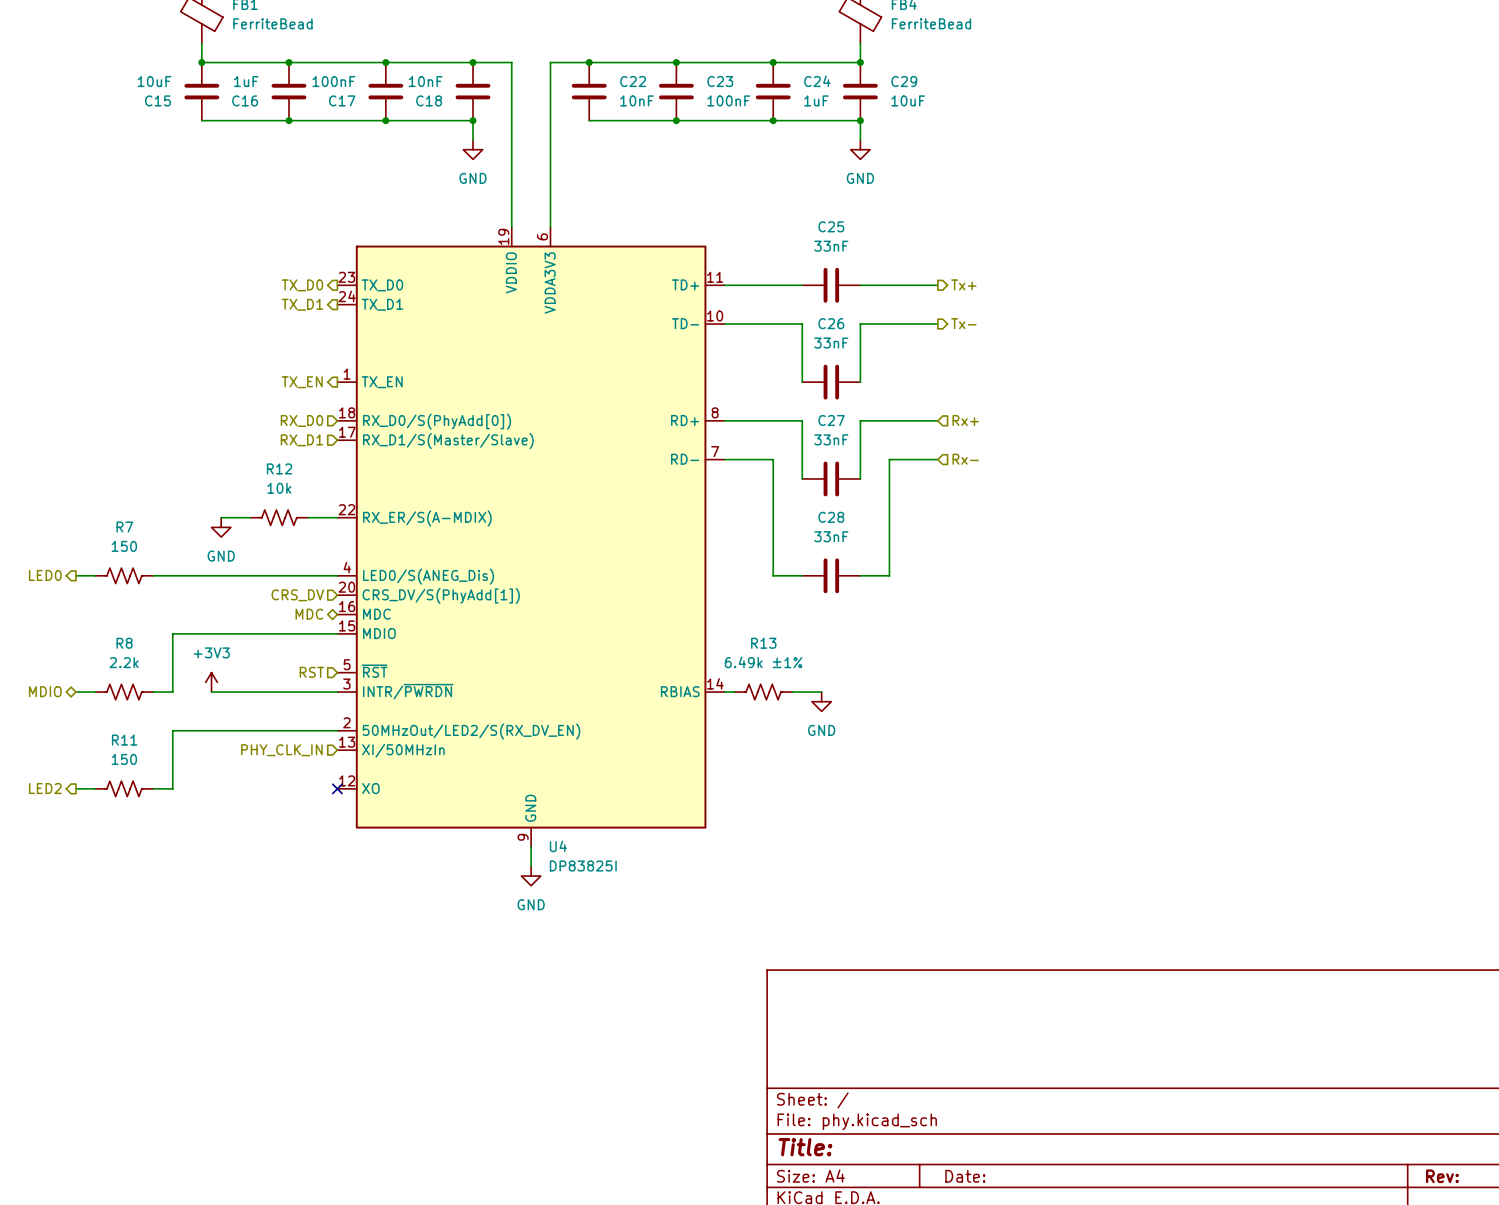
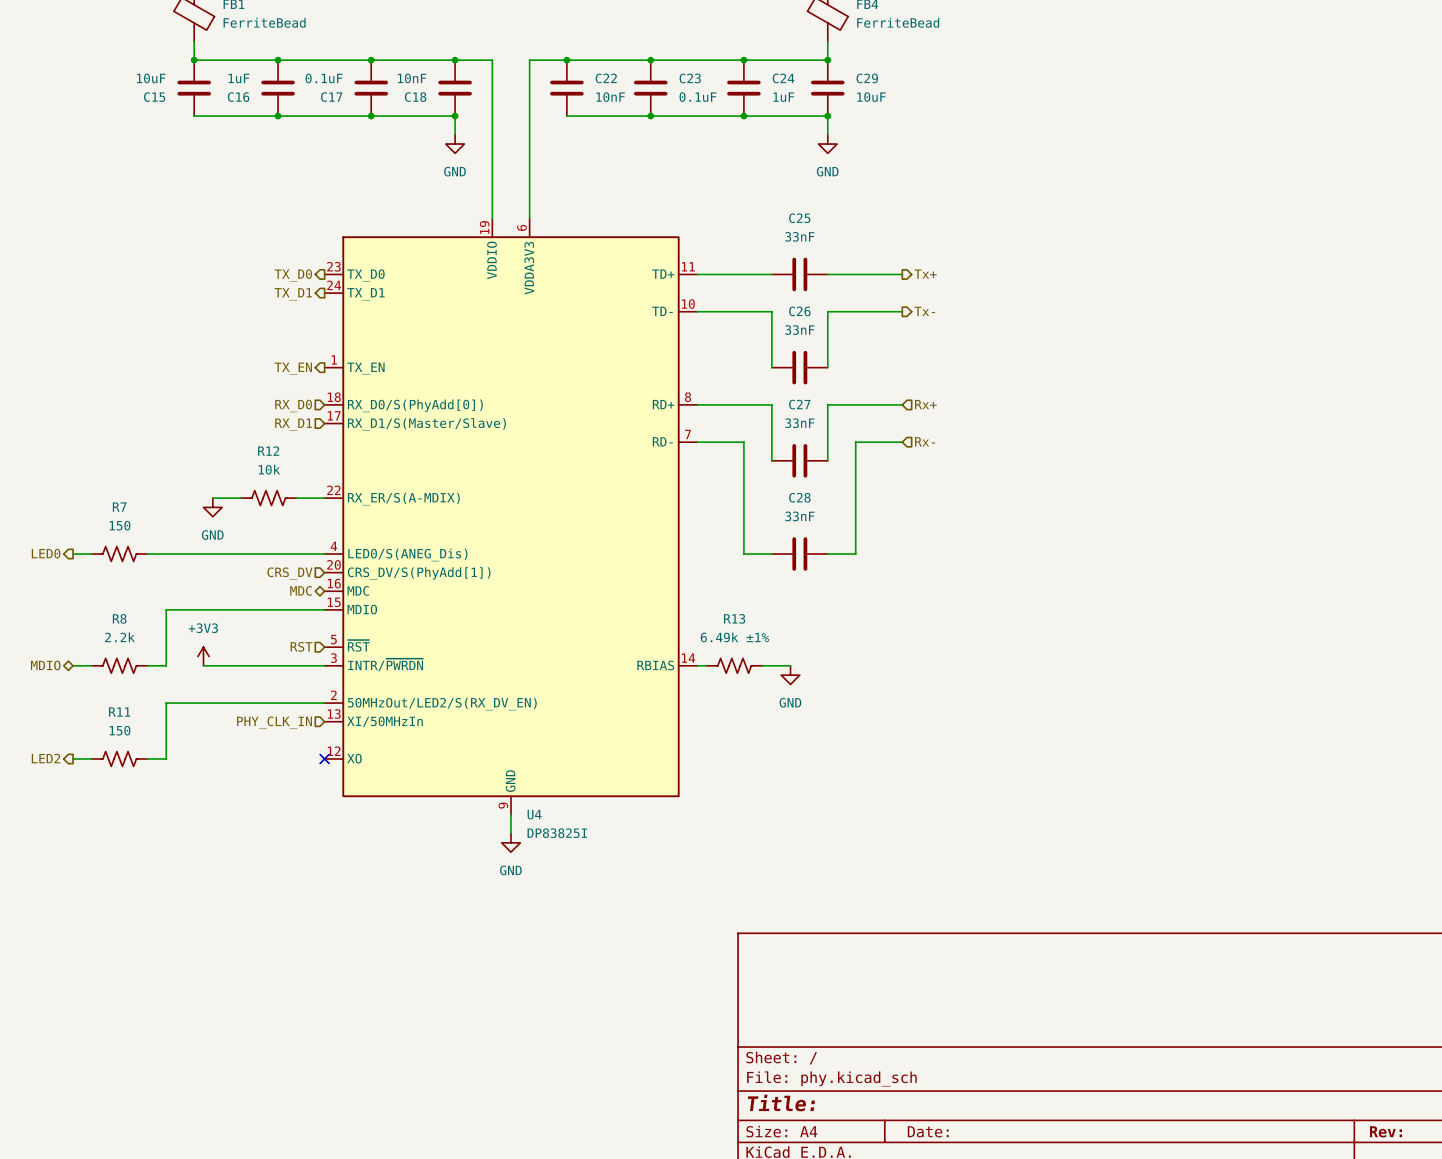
C17 value: 100nF (333, 81) -> 0.1uF (324, 78)
C23 value: 100nF (728, 100) -> 0.1uF (697, 97)

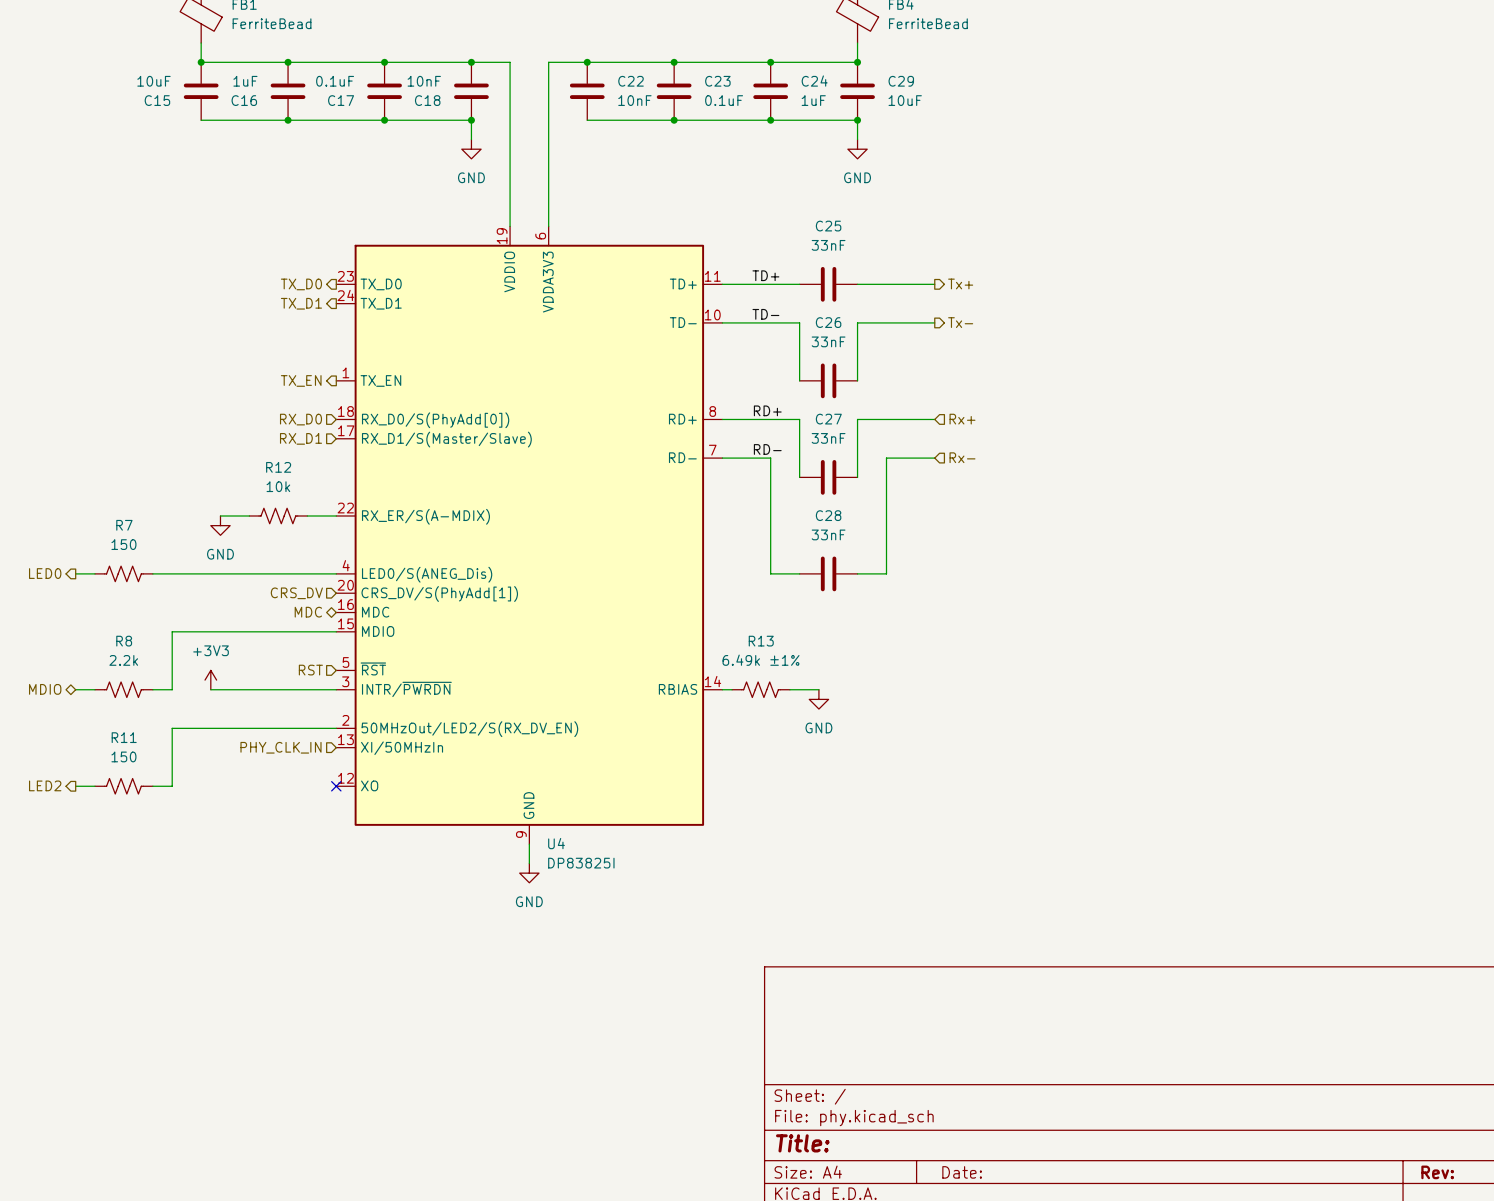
label: none -> TD+ (765, 275)
label: none -> TD- (765, 314)
label: none -> RD+ (767, 410)
label: none -> RD- (767, 449)

